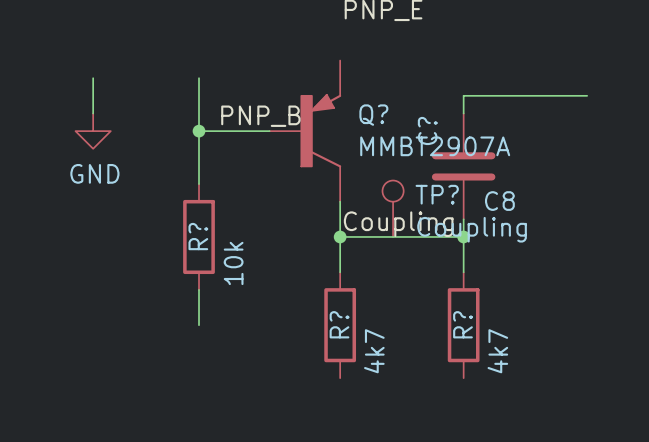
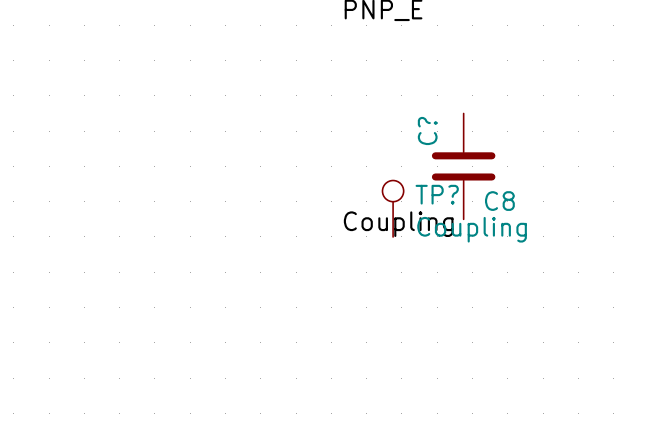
wire: (93, 78) (93, 113) -> none
wire: (199, 78) (199, 184) -> none
wire: (587, 95) (463, 95) (463, 113) -> none
label: PNP_B (260, 116) -> none
power symbol: GND (93, 131) -> none
wire: (199, 131) (269, 131) -> none
junction: (199, 131) -> none
Q?: MMBT2907A (305, 131) -> none
wire: (340, 201) (340, 272) -> none
wire: (463, 219) (463, 272) -> none
R?: 10k (199, 236) -> none
wire: (340, 236) (463, 236) -> none
junction: (340, 236) -> none
junction: (463, 236) -> none
wire: (199, 289) (199, 325) -> none
R?: 4k7 (340, 325) -> none
R?: 4k7 (463, 325) -> none

